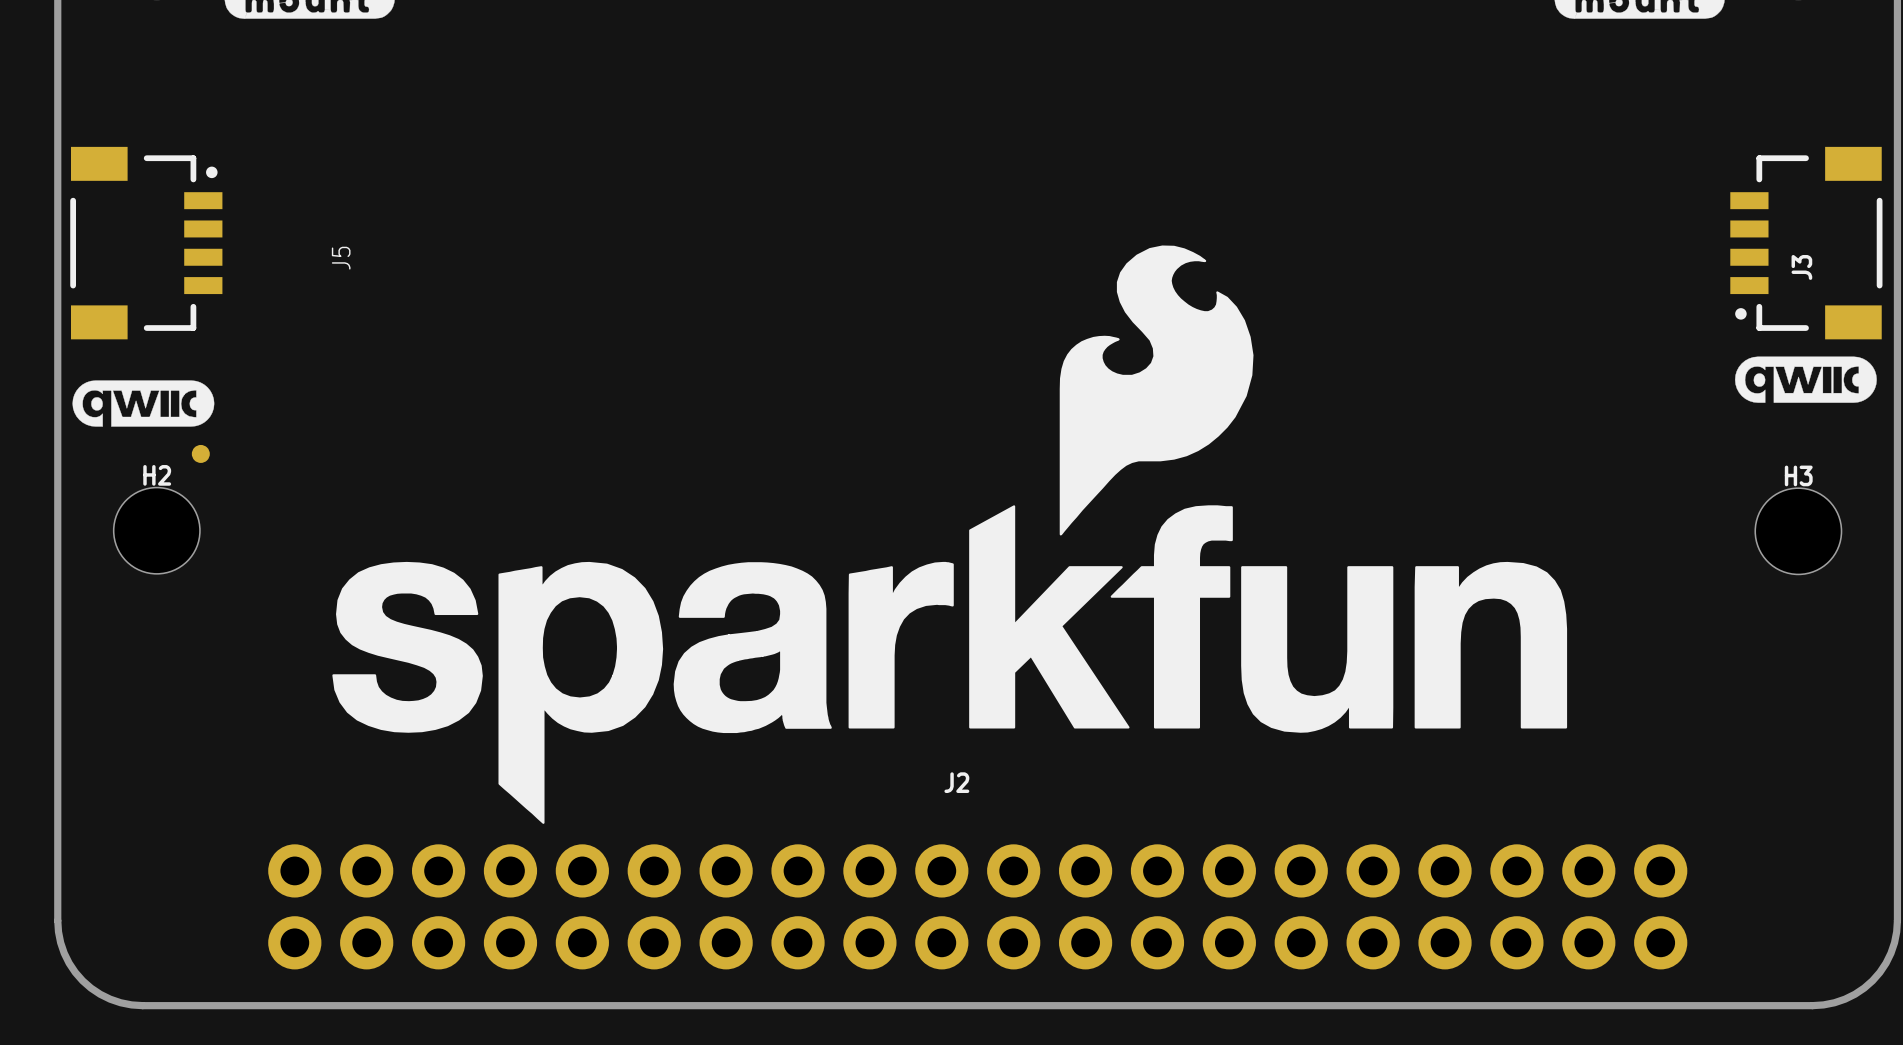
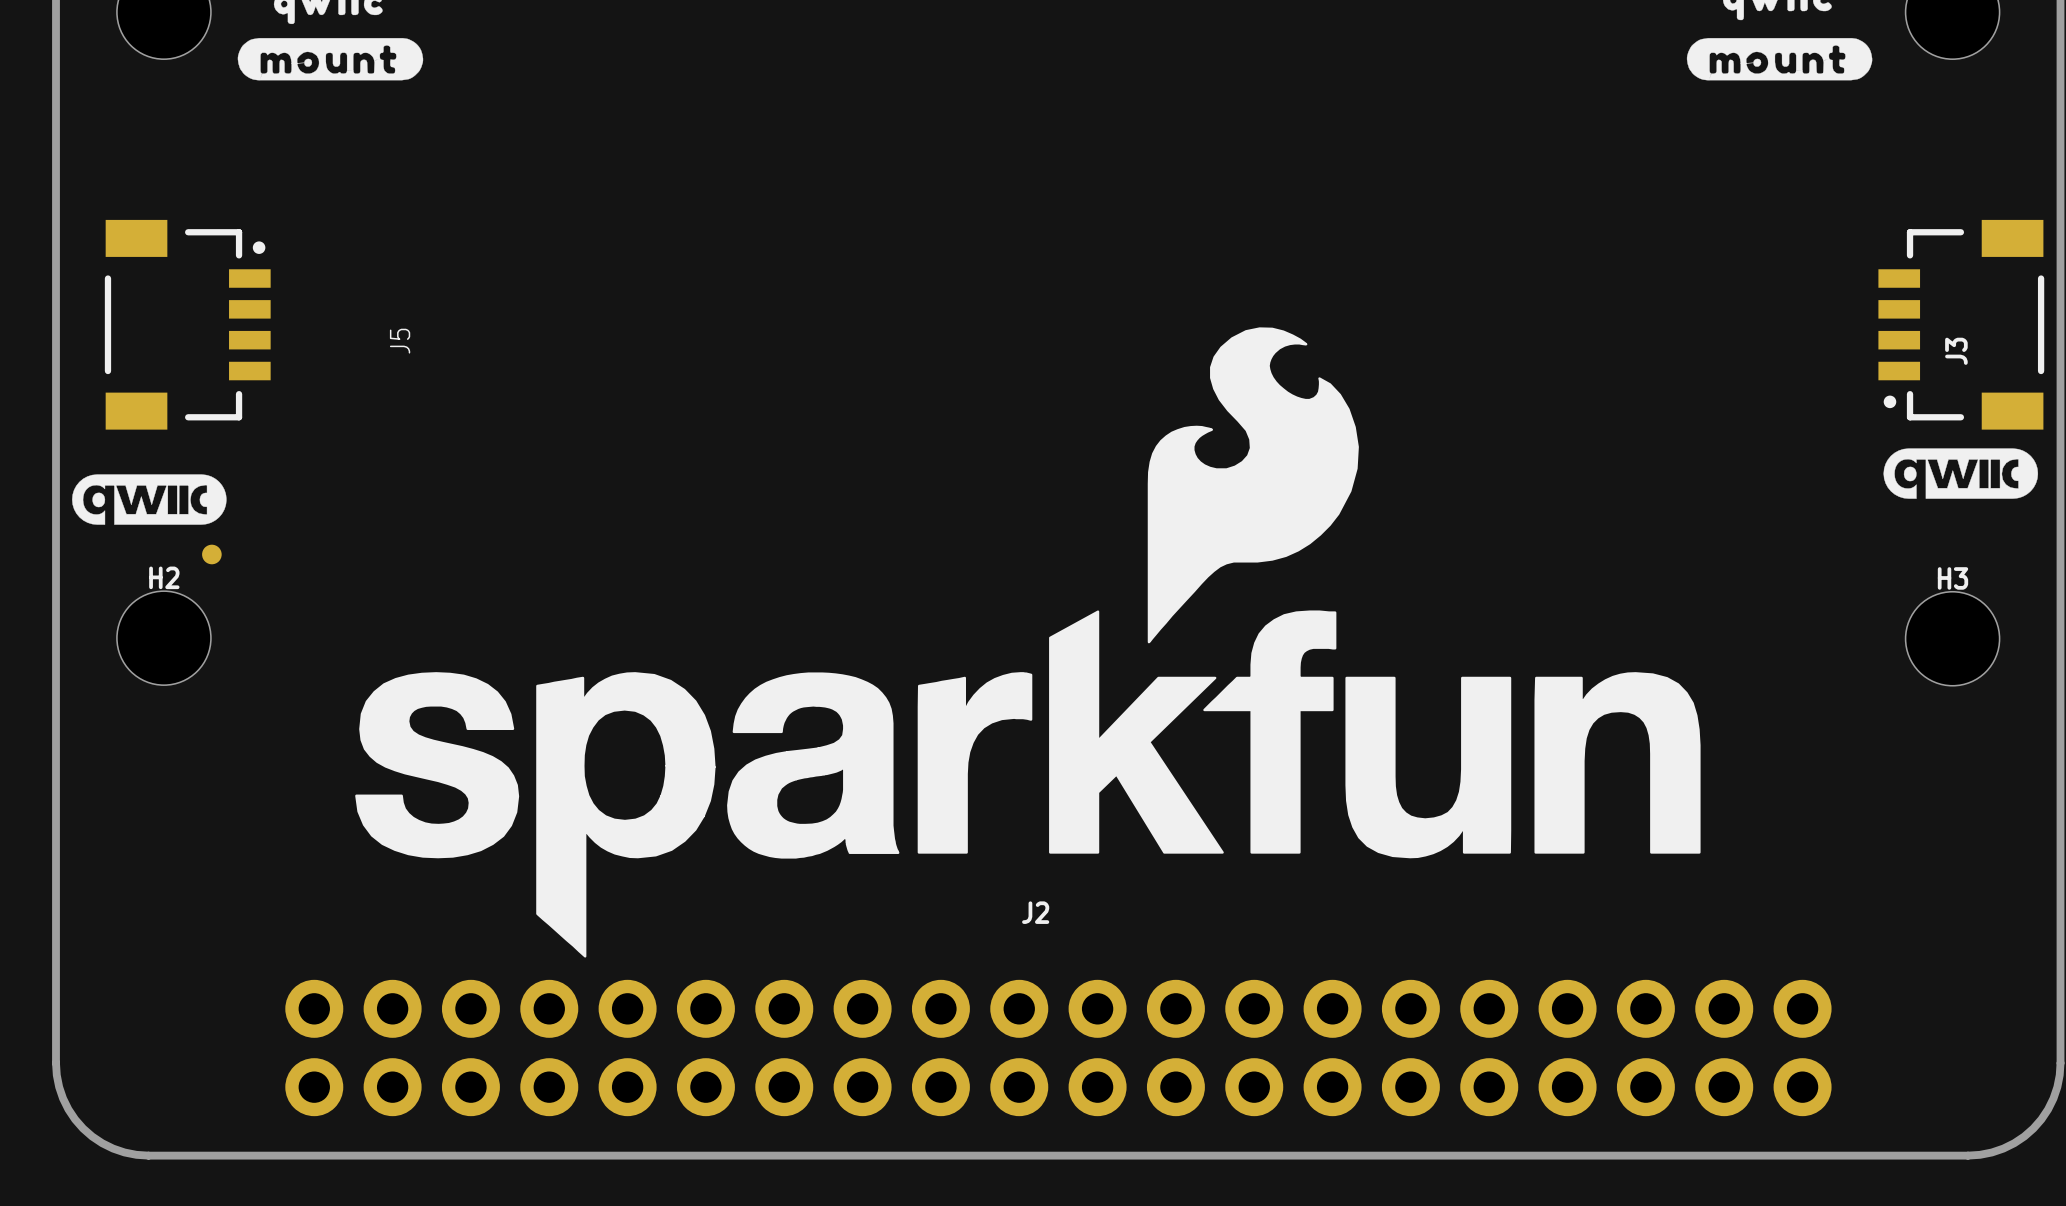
J5 position: (146, 243) -> (187, 324)

